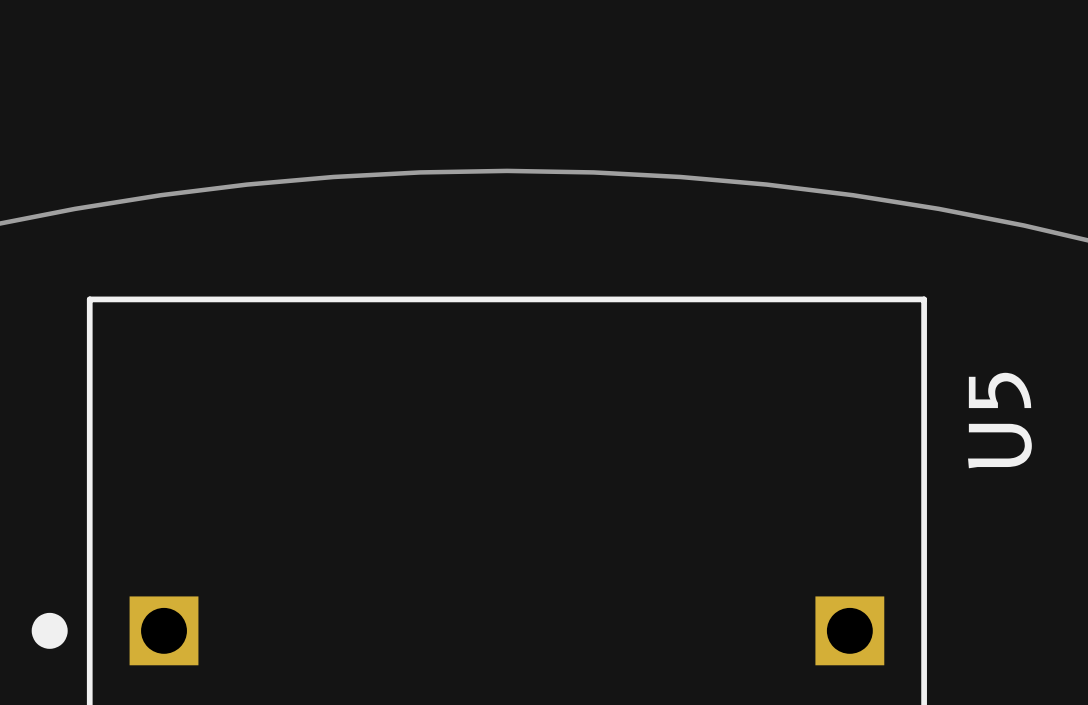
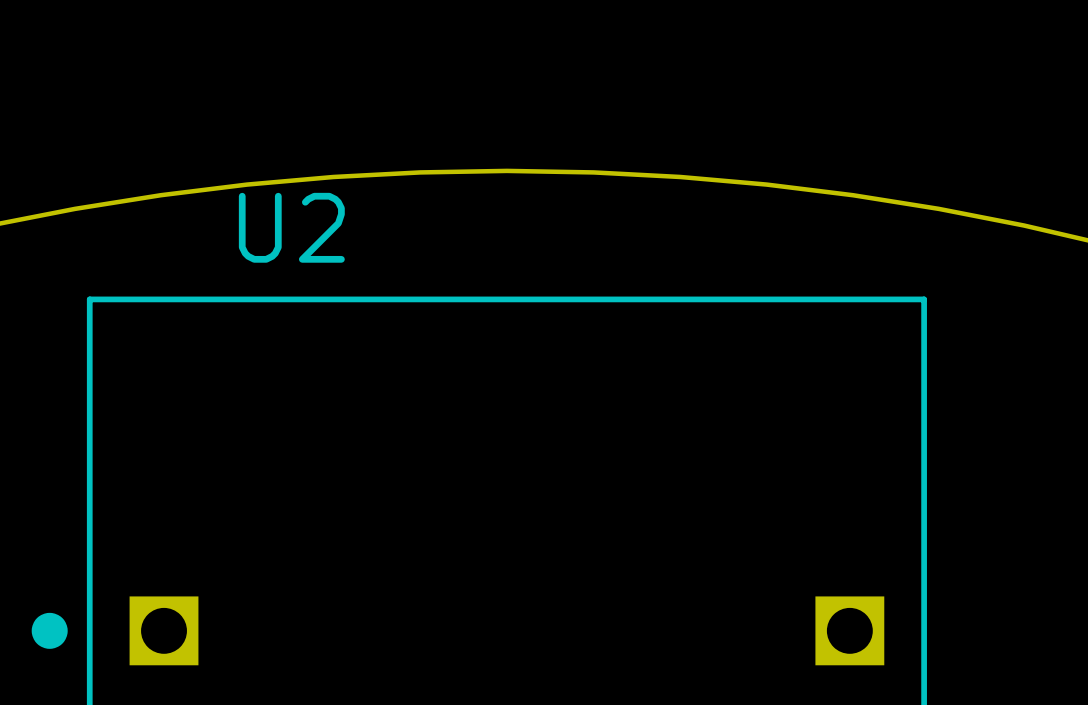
U5 name: U5 (999, 420) -> U2 (291, 227)

